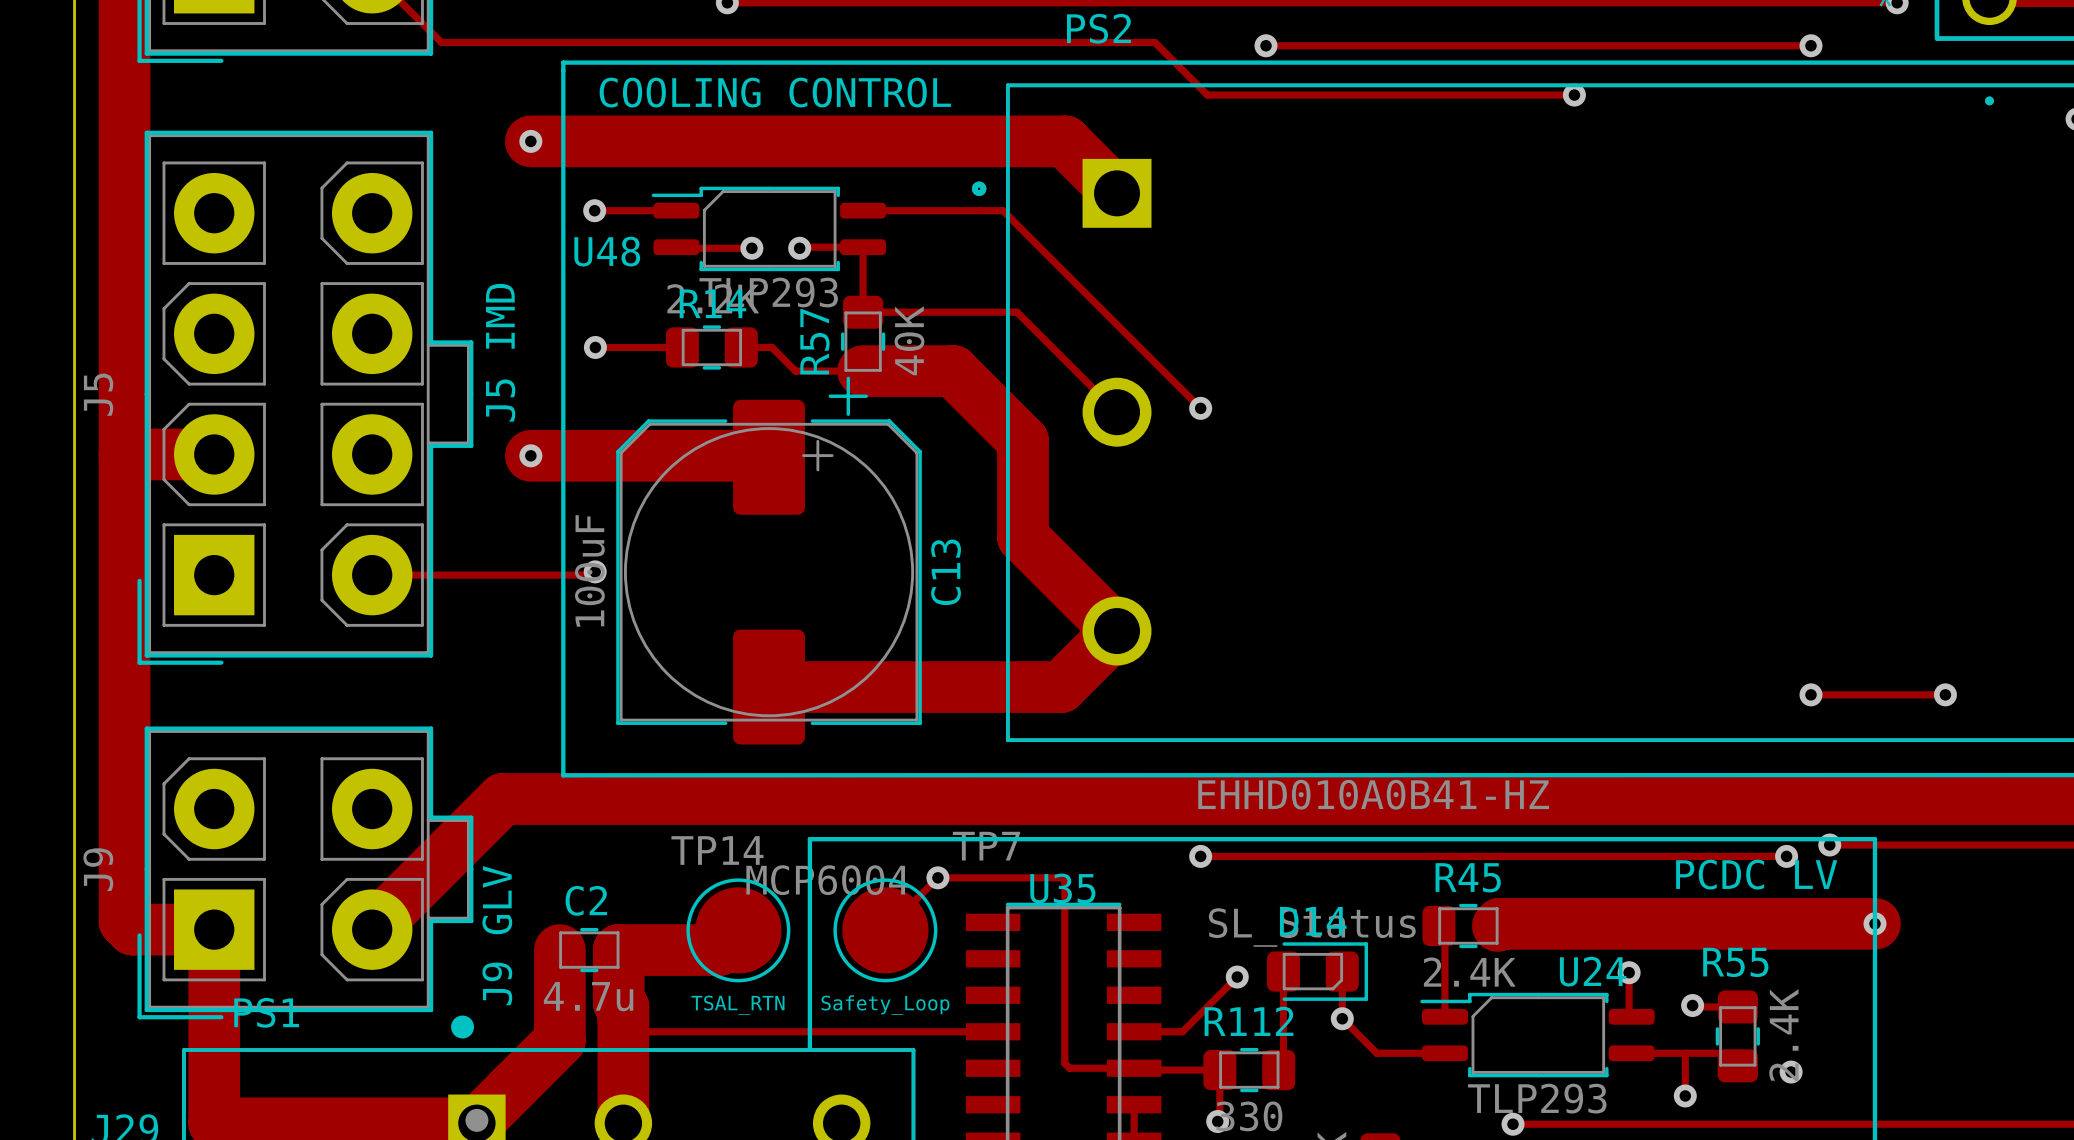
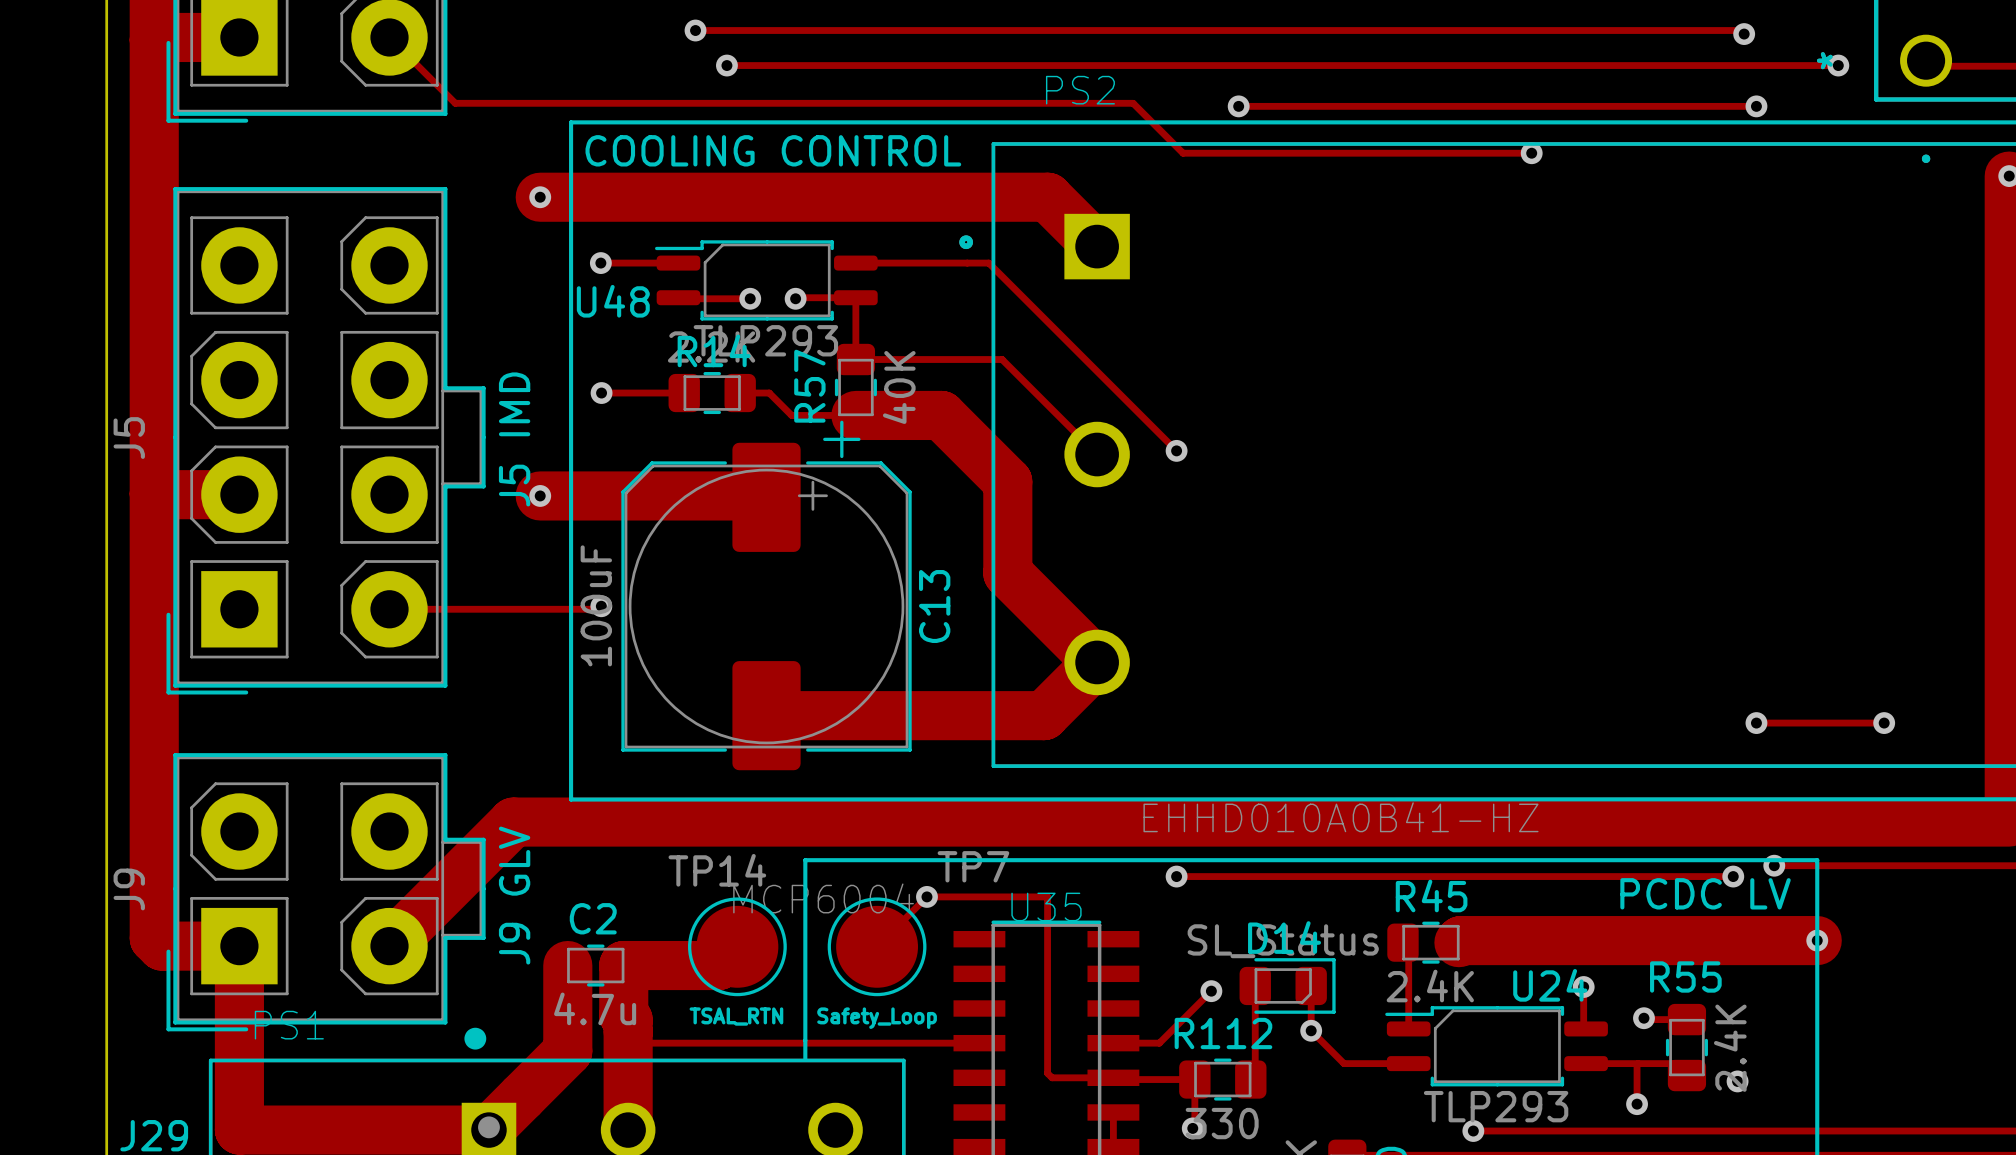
J5 IMD name position: J5 IMD (500, 352) -> J5 IMD (514, 439)
J9 GLV name position: J9 GLV (497, 935) -> J9 GLV (514, 895)

